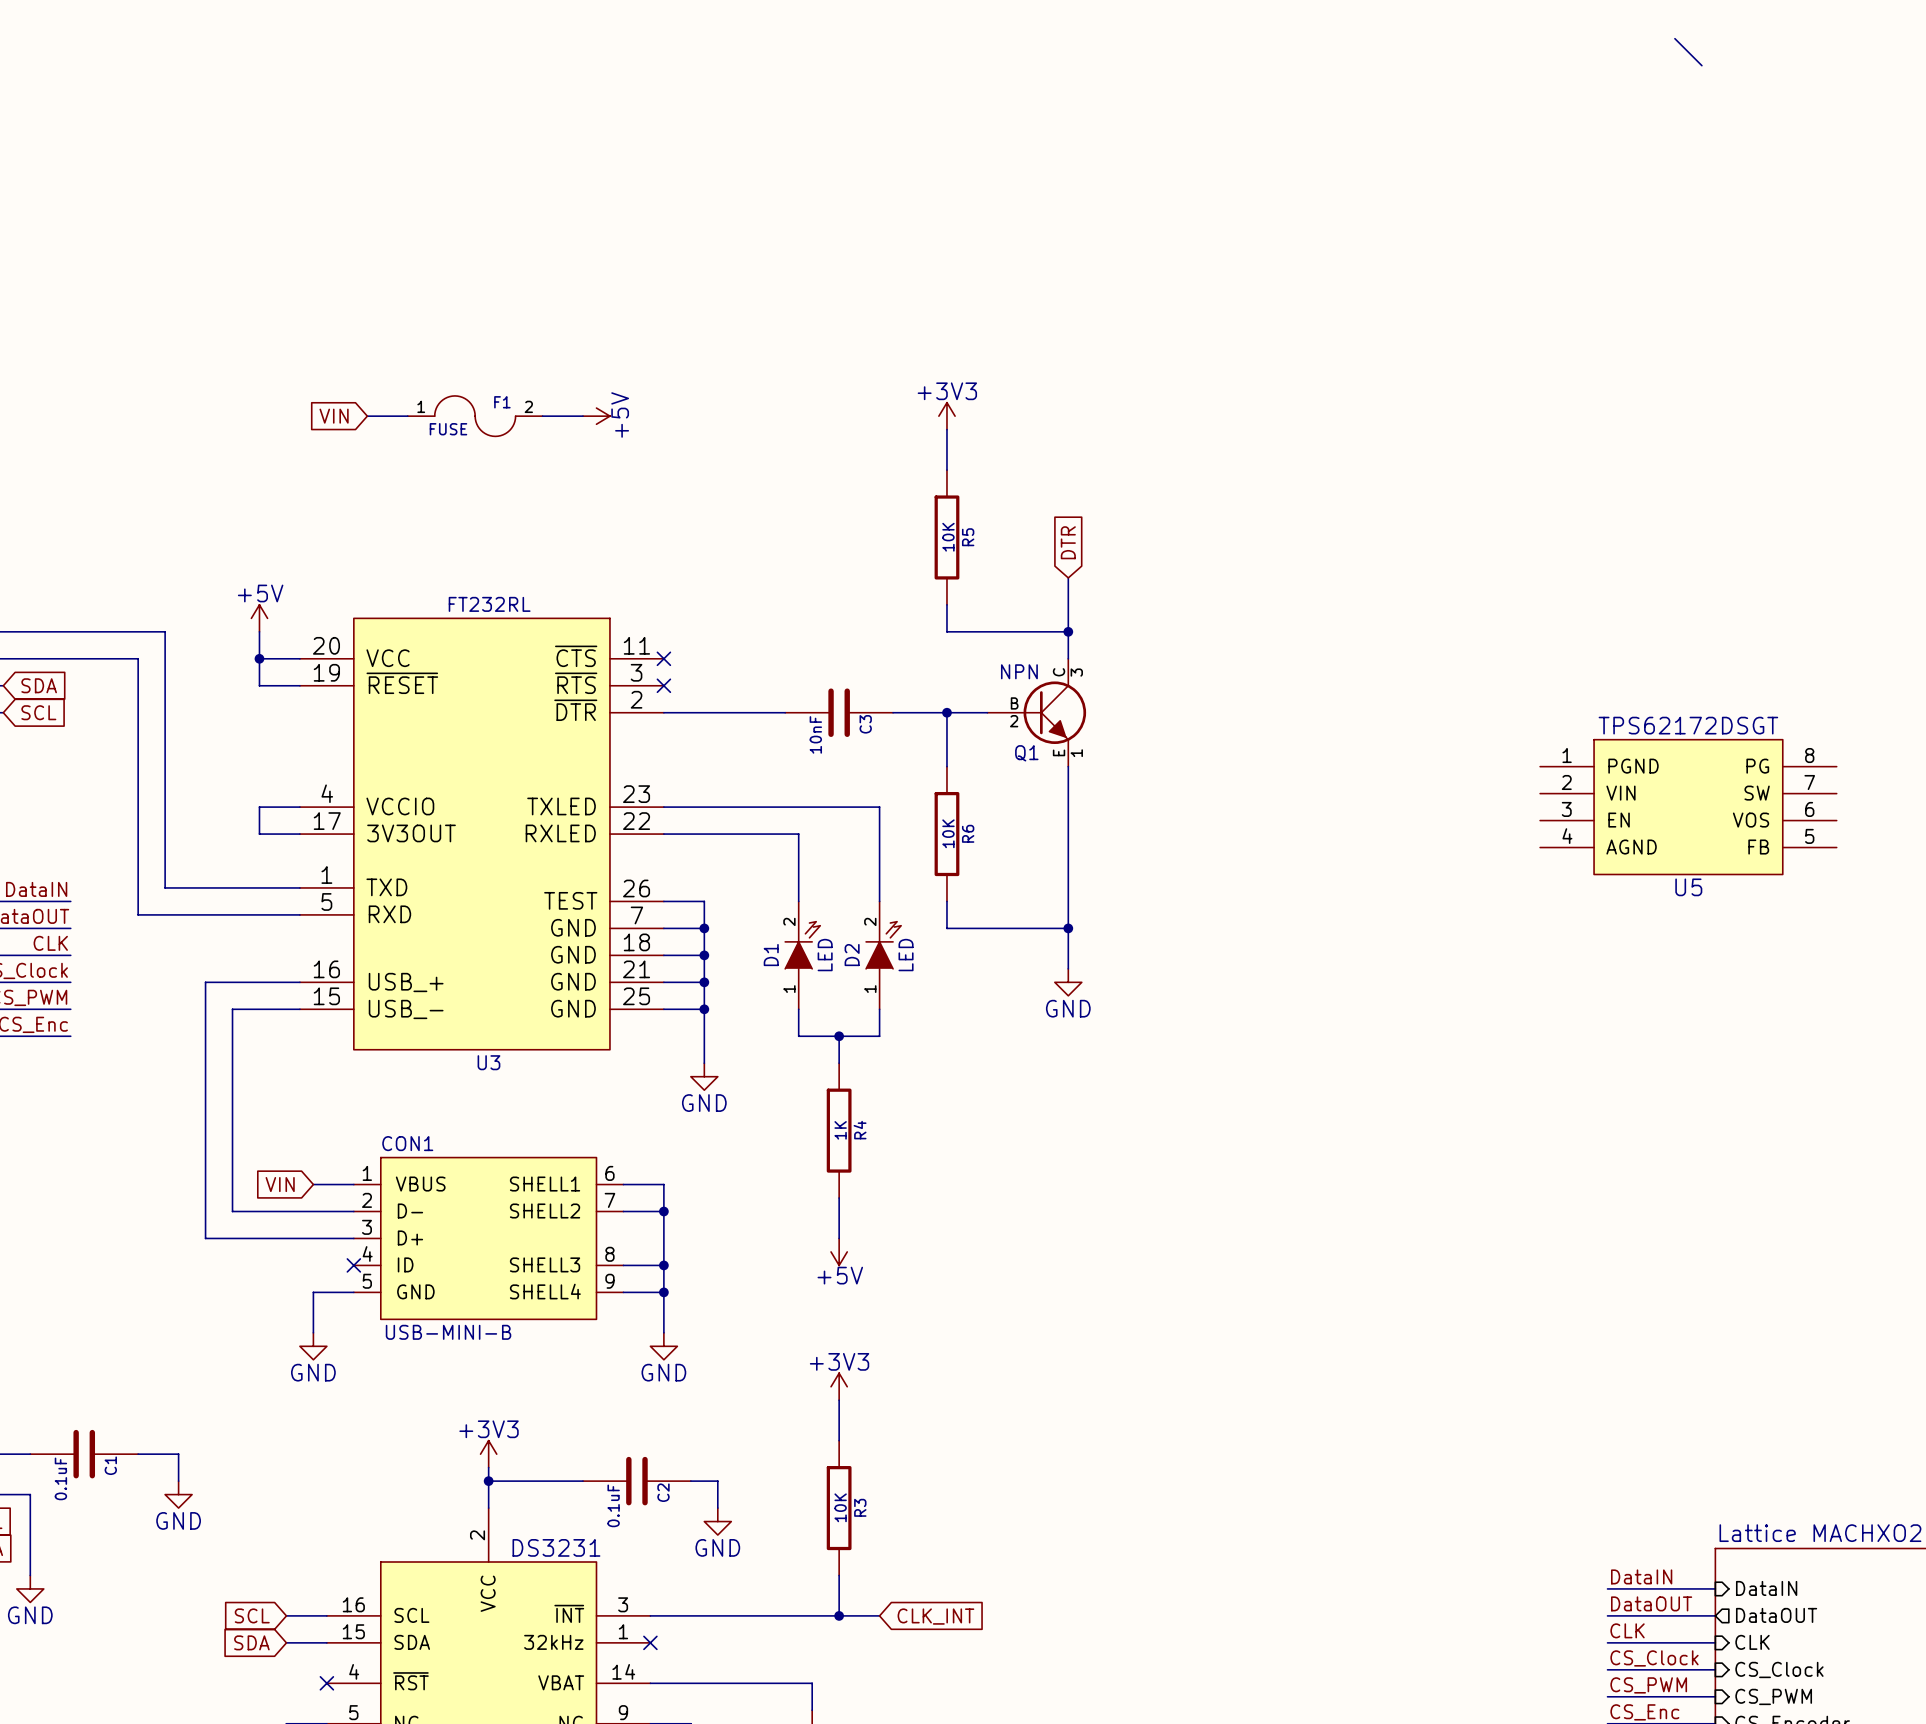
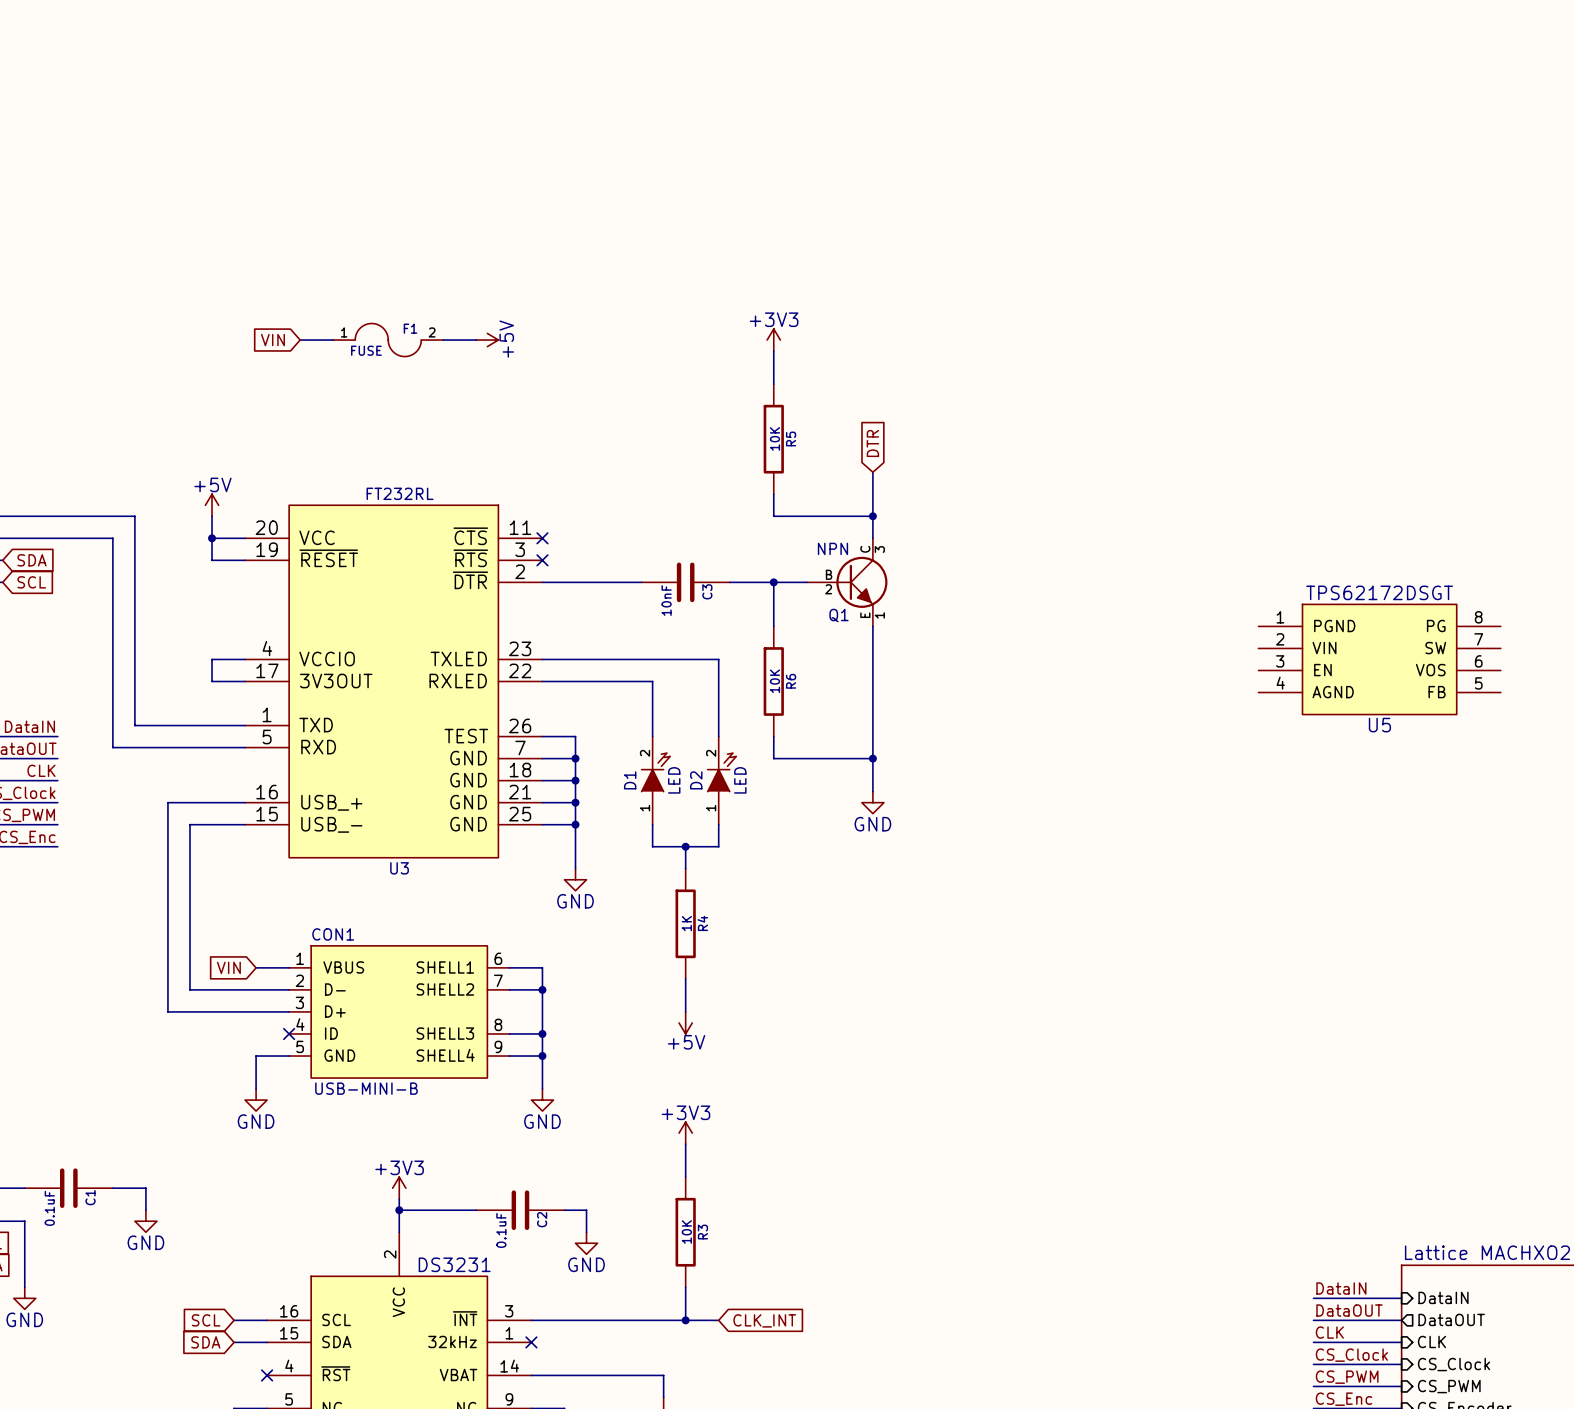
wire: (1674, 38) (1701, 65) -> none

